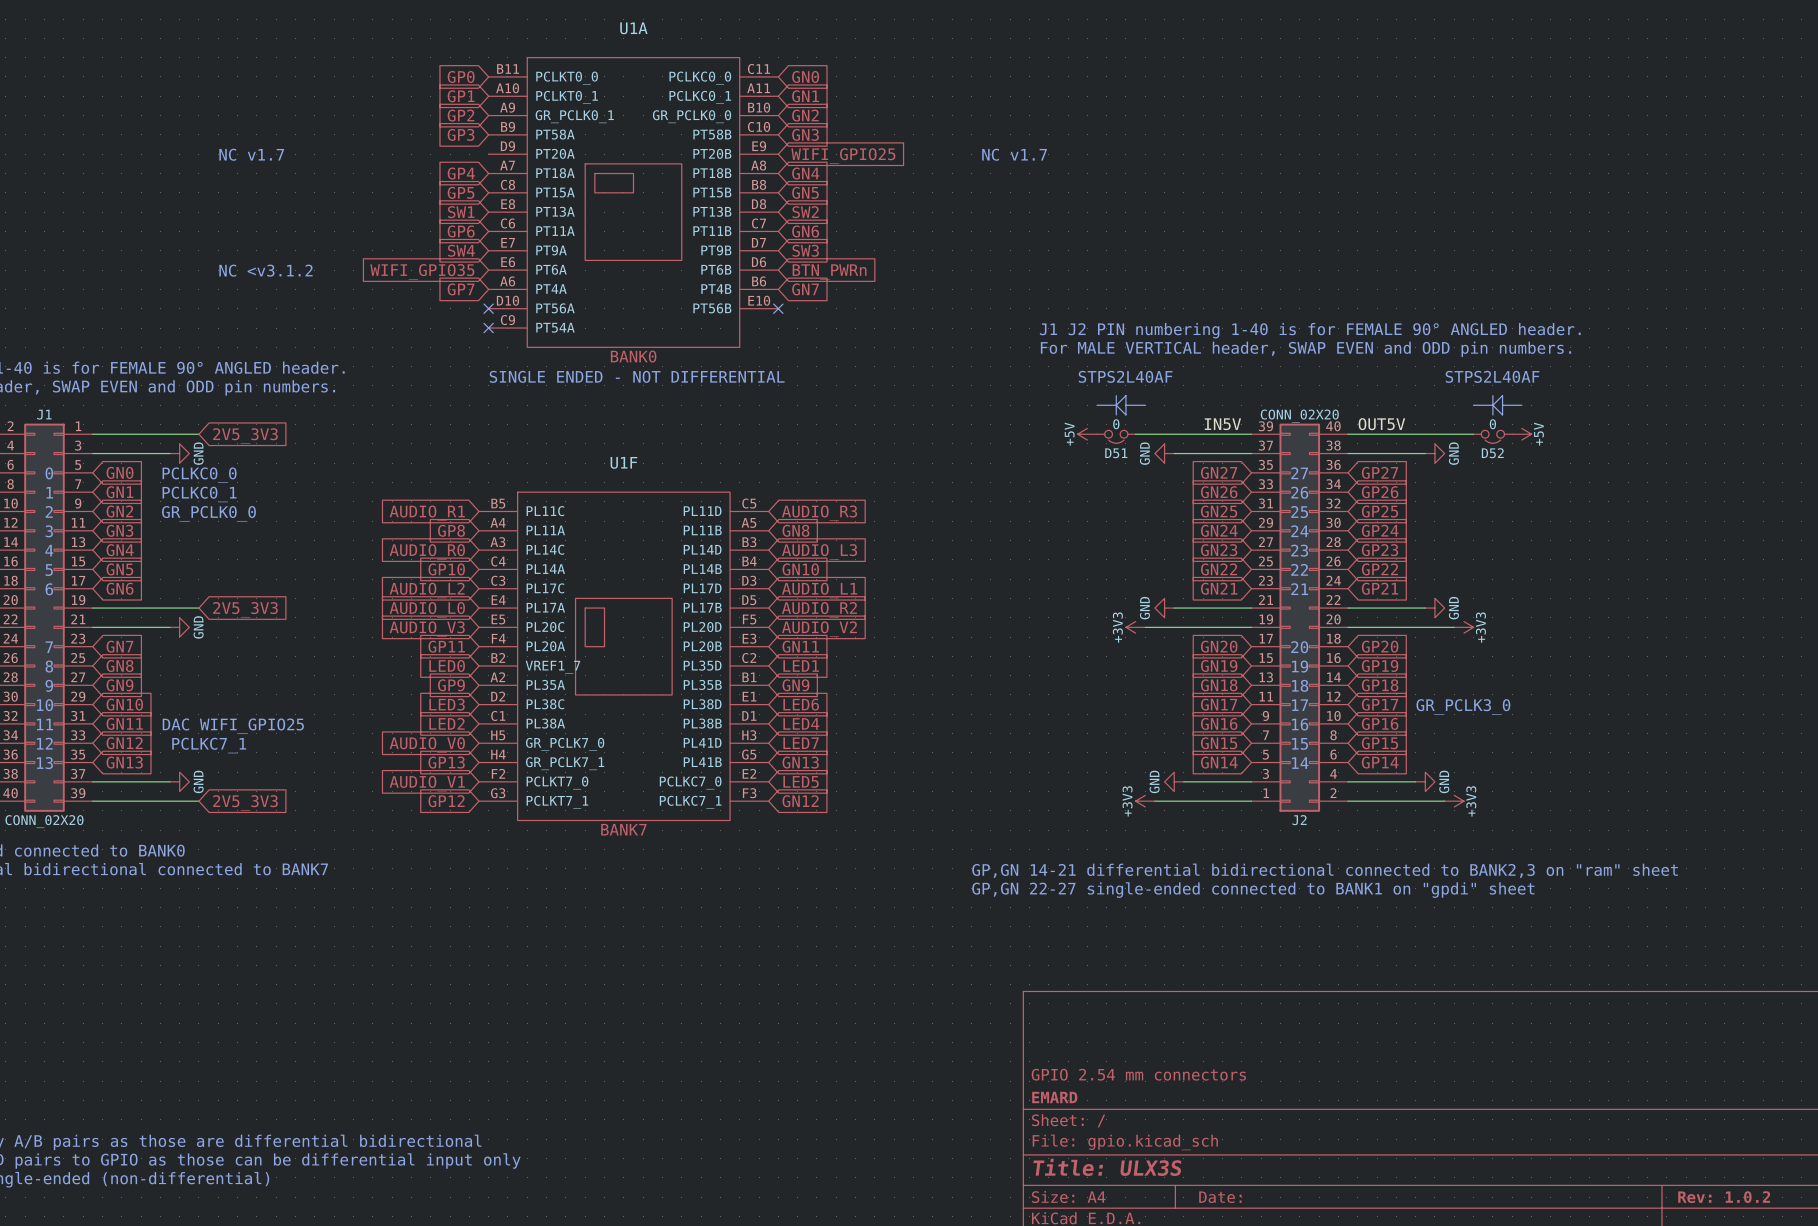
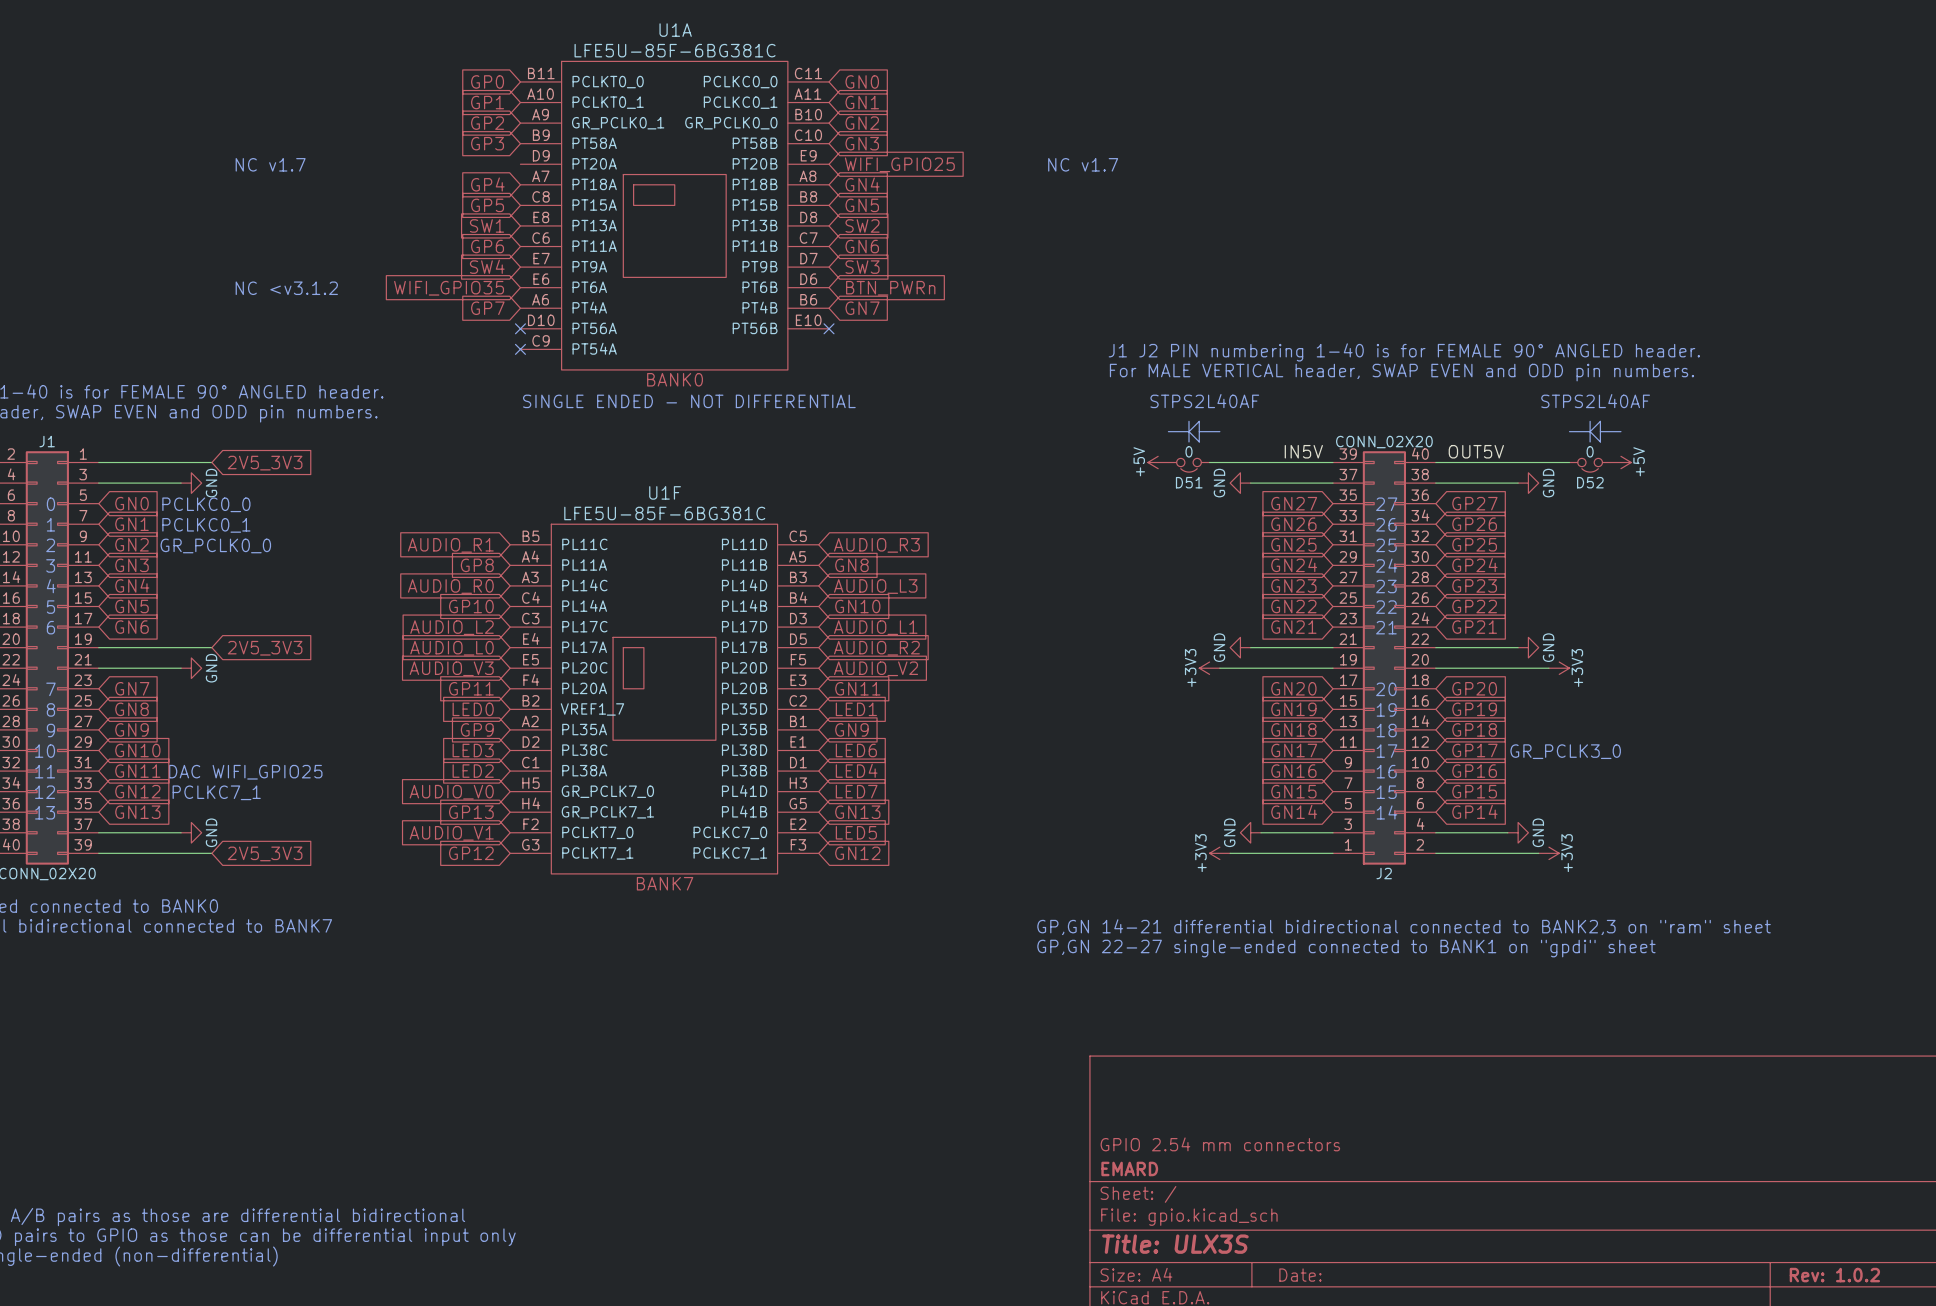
U1A value: none -> LFE5U-85F-6BG381C (675, 50)
U1F value: none -> LFE5U-85F-6BG381C (664, 513)

